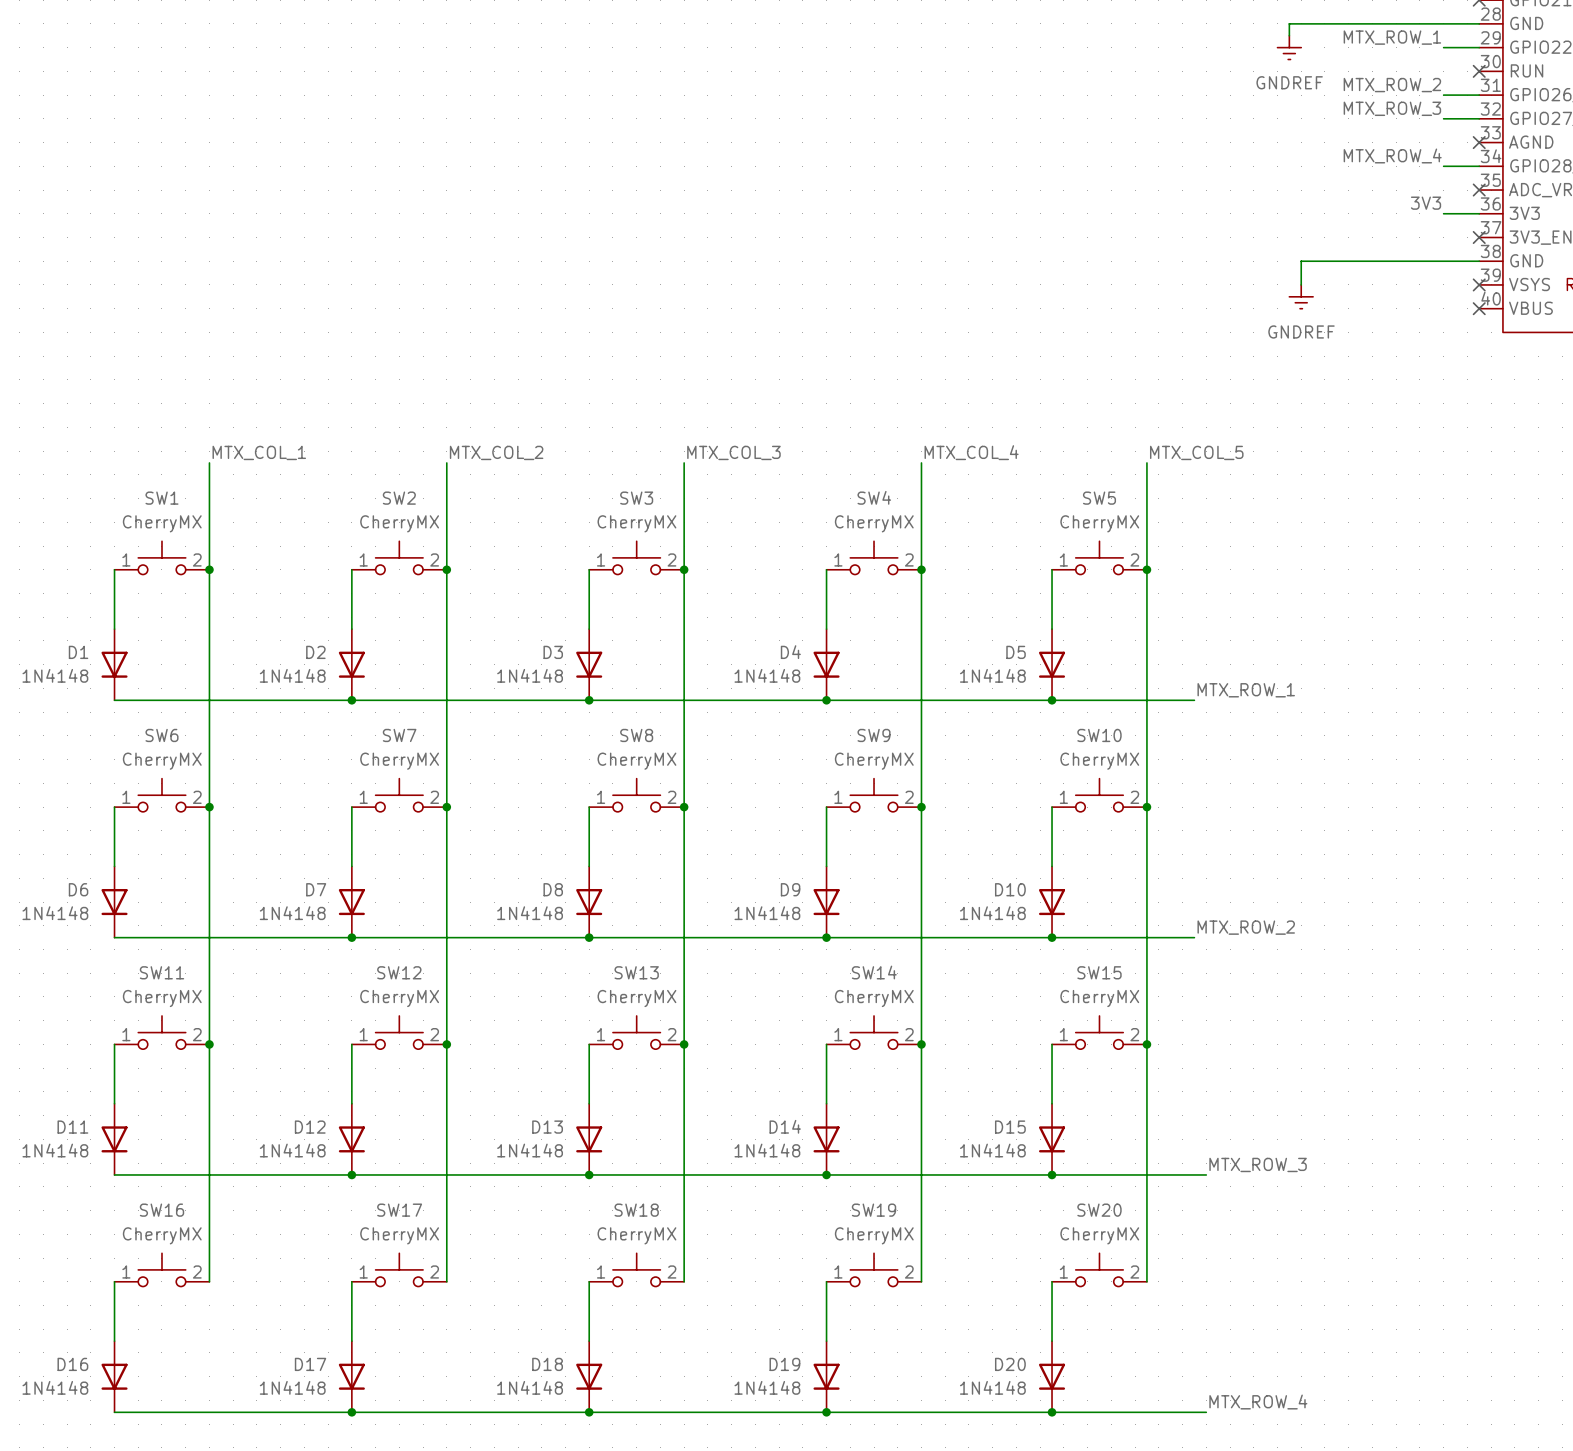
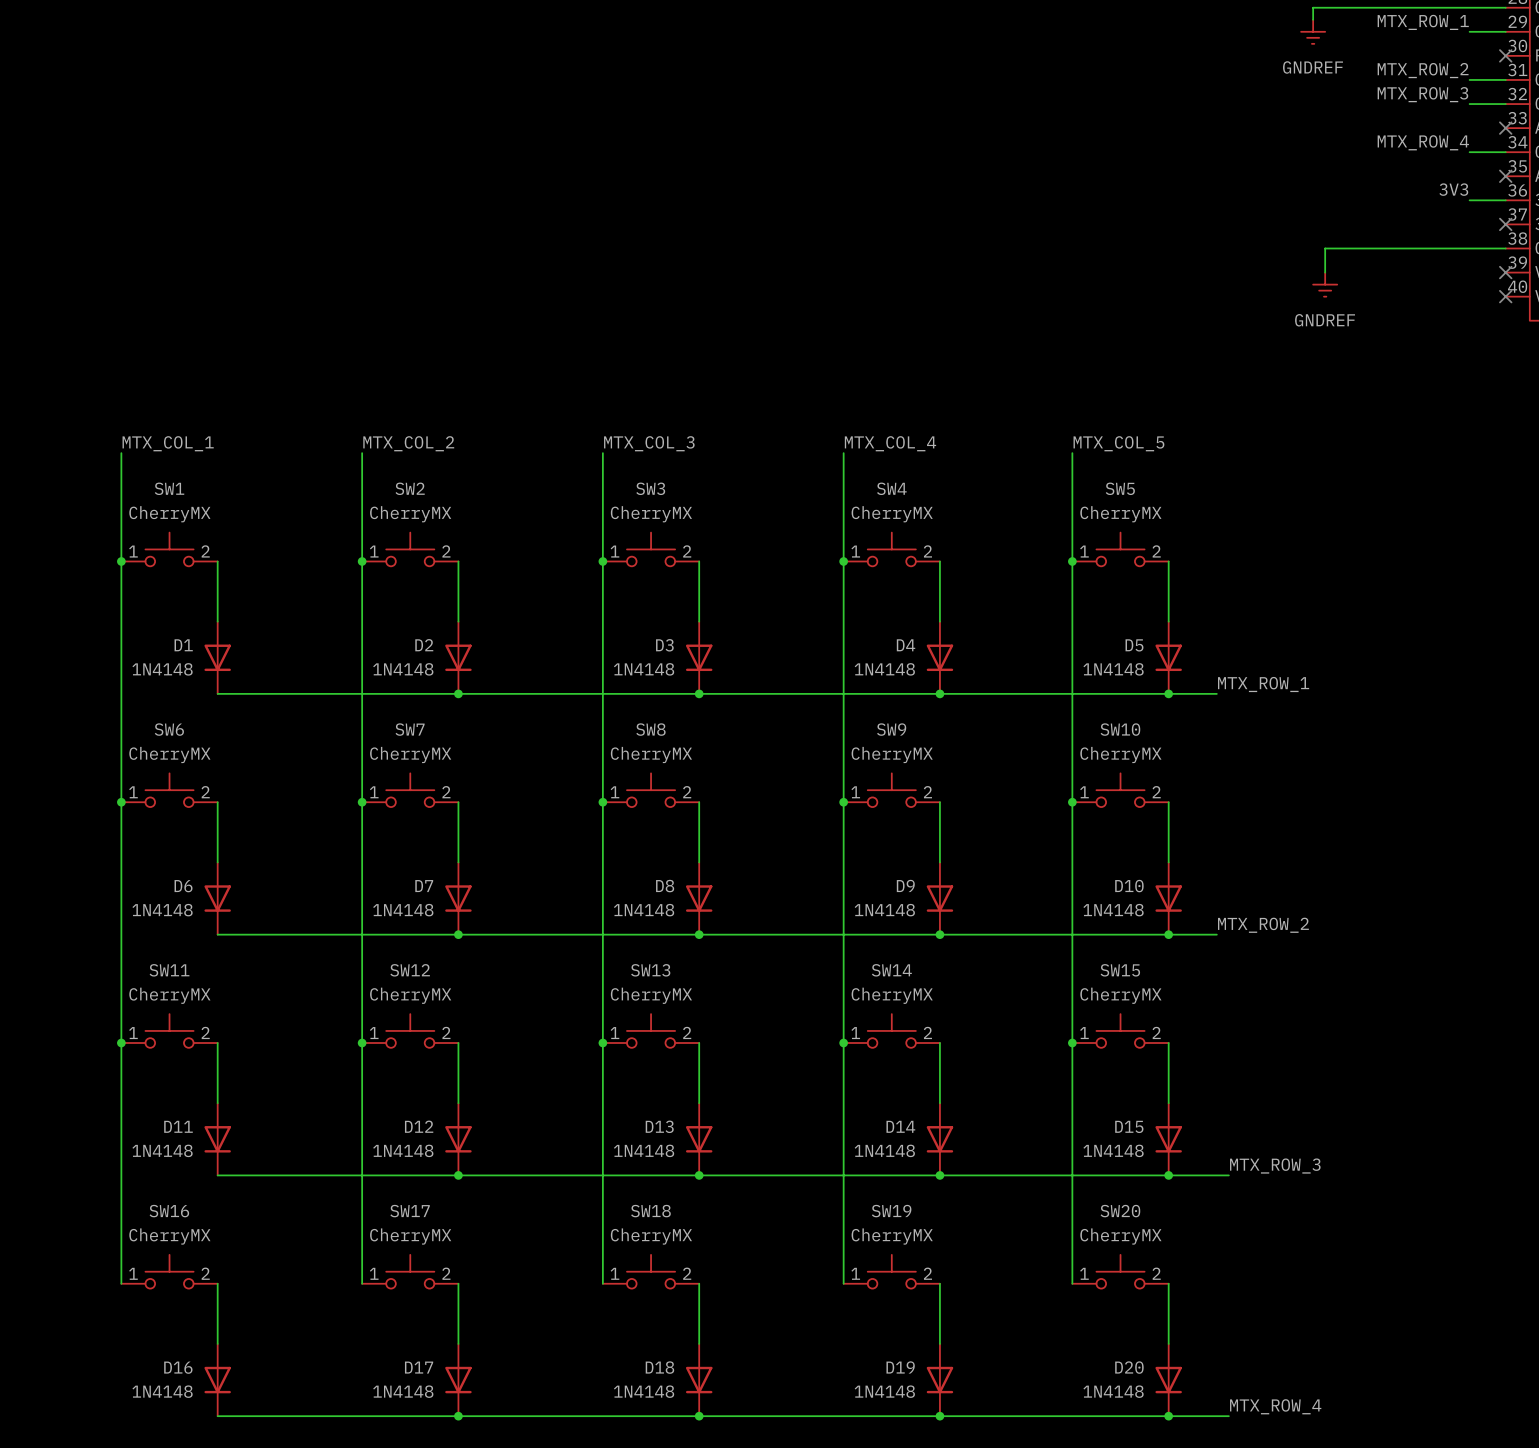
label position: MTX_COL_1 (259, 452) -> MTX_COL_1 (168, 443)
label position: MTX_COL_2 (496, 452) -> MTX_COL_2 (408, 443)
label position: MTX_COL_3 (733, 452) -> MTX_COL_3 (649, 443)
label position: MTX_COL_4 (971, 452) -> MTX_COL_4 (890, 443)
label position: MTX_COL_5 (1196, 452) -> MTX_COL_5 (1118, 443)
wire: (209, 462) (209, 569) -> (121, 453) (121, 561)
wire: (446, 462) (446, 569) -> (362, 453) (362, 561)
wire: (684, 462) (684, 569) -> (602, 453) (602, 561)
wire: (921, 462) (921, 569) -> (843, 453) (843, 561)
wire: (1146, 462) (1146, 569) -> (1072, 453) (1072, 561)
junction: none -> (121, 561)
junction: (209, 569) -> none
junction: none -> (362, 561)
junction: (446, 569) -> none
junction: none -> (602, 561)
junction: (684, 569) -> none
junction: none -> (843, 561)
junction: (921, 569) -> none
junction: none -> (1072, 561)
junction: (1146, 569) -> none
wire: (209, 629) (209, 807) -> (121, 621) (121, 802)
wire: (446, 629) (446, 807) -> (362, 621) (362, 802)
wire: (684, 629) (684, 807) -> (602, 621) (602, 802)
wire: (921, 629) (921, 807) -> (843, 621) (843, 802)
wire: (1146, 629) (1146, 807) -> (1072, 621) (1072, 802)
D1 position: (114, 664) -> (217, 657)
D2 position: (351, 664) -> (458, 657)
D3 position: (589, 664) -> (699, 657)
D4 position: (826, 664) -> (939, 657)
D5 position: (1052, 664) -> (1168, 657)
wire: (114, 700) (209, 700) -> none
junction: (351, 700) -> none
junction: none -> (458, 693)
junction: (589, 700) -> none
junction: none -> (699, 693)
junction: (826, 700) -> none
junction: none -> (939, 693)
junction: (1052, 700) -> none
junction: none -> (1168, 693)
junction: none -> (121, 802)
junction: (209, 807) -> none
junction: none -> (362, 802)
junction: (446, 807) -> none
junction: none -> (602, 802)
junction: (684, 807) -> none
junction: none -> (843, 802)
junction: (921, 807) -> none
junction: none -> (1072, 802)
junction: (1146, 807) -> none
wire: (209, 866) (209, 1044) -> (121, 862) (121, 1043)
wire: (446, 866) (446, 1044) -> (362, 862) (362, 1043)
wire: (684, 866) (684, 1044) -> (602, 862) (602, 1043)
wire: (921, 866) (921, 1044) -> (843, 862) (843, 1043)
wire: (1146, 866) (1146, 1044) -> (1072, 862) (1072, 1043)
D6 position: (114, 902) -> (217, 898)
D7 position: (351, 902) -> (458, 898)
D8 position: (589, 902) -> (699, 898)
D9 position: (826, 902) -> (939, 898)
D10 position: (1052, 902) -> (1168, 898)
wire: (114, 937) (209, 937) -> none
junction: (351, 937) -> none
junction: none -> (458, 934)
junction: (589, 937) -> none
junction: none -> (699, 934)
junction: (826, 937) -> none
junction: none -> (939, 934)
junction: (1052, 937) -> none
junction: none -> (1168, 934)
junction: none -> (121, 1043)
junction: (209, 1044) -> none
junction: none -> (362, 1043)
junction: (446, 1044) -> none
junction: none -> (602, 1043)
junction: (684, 1044) -> none
junction: none -> (843, 1043)
junction: (921, 1044) -> none
junction: none -> (1072, 1043)
junction: (1146, 1044) -> none
wire: (209, 1103) (209, 1281) -> (217, 1343) (217, 1283)
wire: (446, 1103) (446, 1281) -> (458, 1343) (458, 1283)
wire: (684, 1103) (684, 1281) -> (699, 1343) (699, 1283)
wire: (921, 1103) (921, 1281) -> (939, 1343) (939, 1283)
wire: (1146, 1103) (1146, 1281) -> (1168, 1343) (1168, 1283)
D11 position: (114, 1139) -> (217, 1139)
D12 position: (351, 1139) -> (458, 1139)
D13 position: (589, 1139) -> (699, 1139)
D14 position: (826, 1139) -> (939, 1139)
D15 position: (1052, 1139) -> (1168, 1139)
wire: (114, 1174) (209, 1174) -> none
junction: (351, 1174) -> none
junction: none -> (458, 1175)
junction: (589, 1174) -> none
junction: none -> (699, 1175)
junction: (826, 1174) -> none
junction: none -> (939, 1175)
junction: (1052, 1174) -> none
junction: none -> (1168, 1175)
wire: (114, 1281) (114, 1341) -> (121, 1283) (121, 1103)
wire: (351, 1281) (351, 1341) -> (362, 1283) (362, 1103)
wire: (589, 1281) (589, 1341) -> (602, 1283) (602, 1103)
wire: (826, 1281) (826, 1341) -> (843, 1283) (843, 1103)
wire: (1052, 1281) (1052, 1341) -> (1072, 1283) (1072, 1103)
D16 position: (114, 1376) -> (217, 1380)
D17 position: (351, 1376) -> (458, 1380)
D18 position: (589, 1376) -> (699, 1380)
D19 position: (826, 1376) -> (939, 1380)
D20 position: (1052, 1376) -> (1168, 1380)
wire: (114, 1412) (209, 1412) -> none
junction: (351, 1412) -> none
junction: none -> (458, 1416)
junction: (589, 1412) -> none
junction: none -> (699, 1416)
junction: (826, 1412) -> none
junction: none -> (939, 1416)
junction: (1052, 1412) -> none
junction: none -> (1168, 1416)

